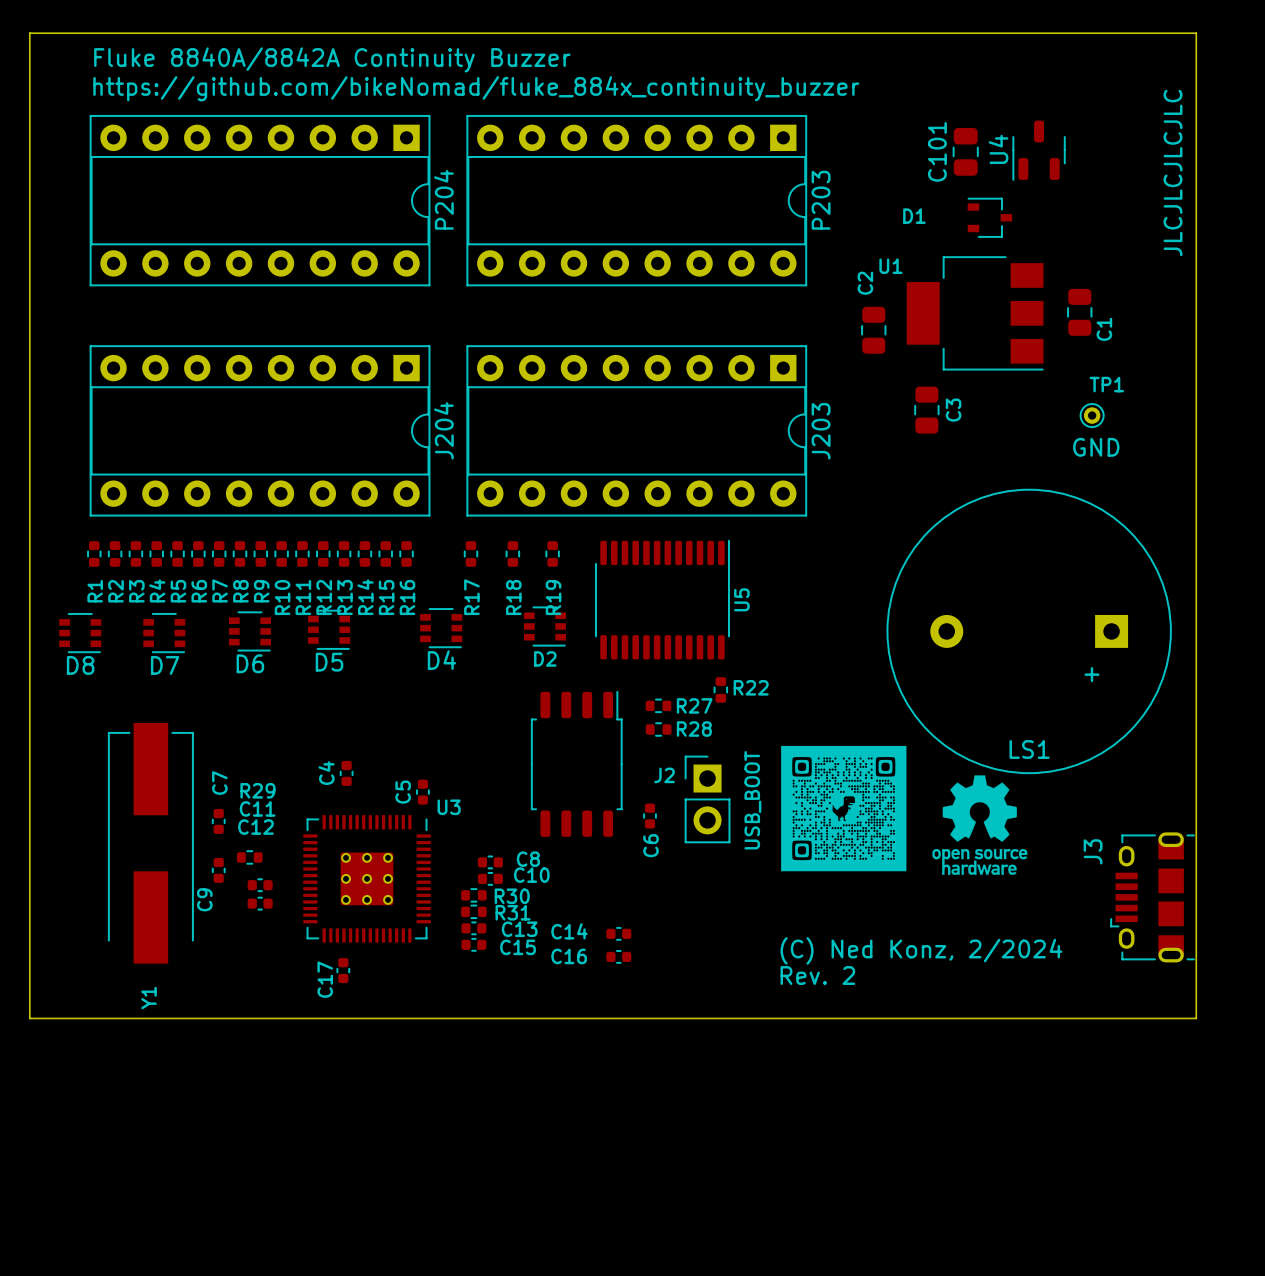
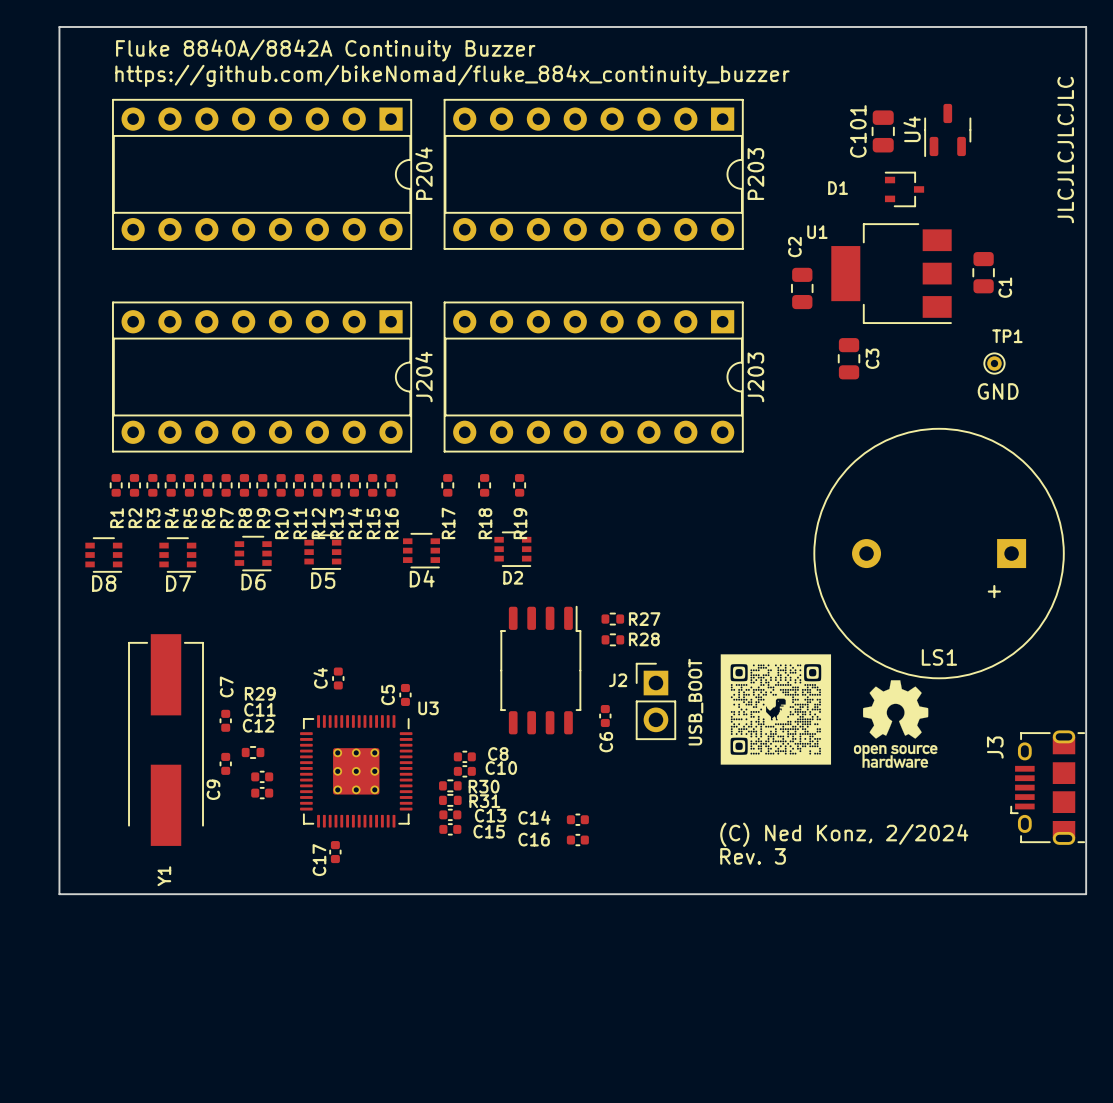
U5: (662, 599) -> none
R22: (720, 689) -> none
text: Rev. 2 (817, 975) -> Rev. 3 (753, 856)

